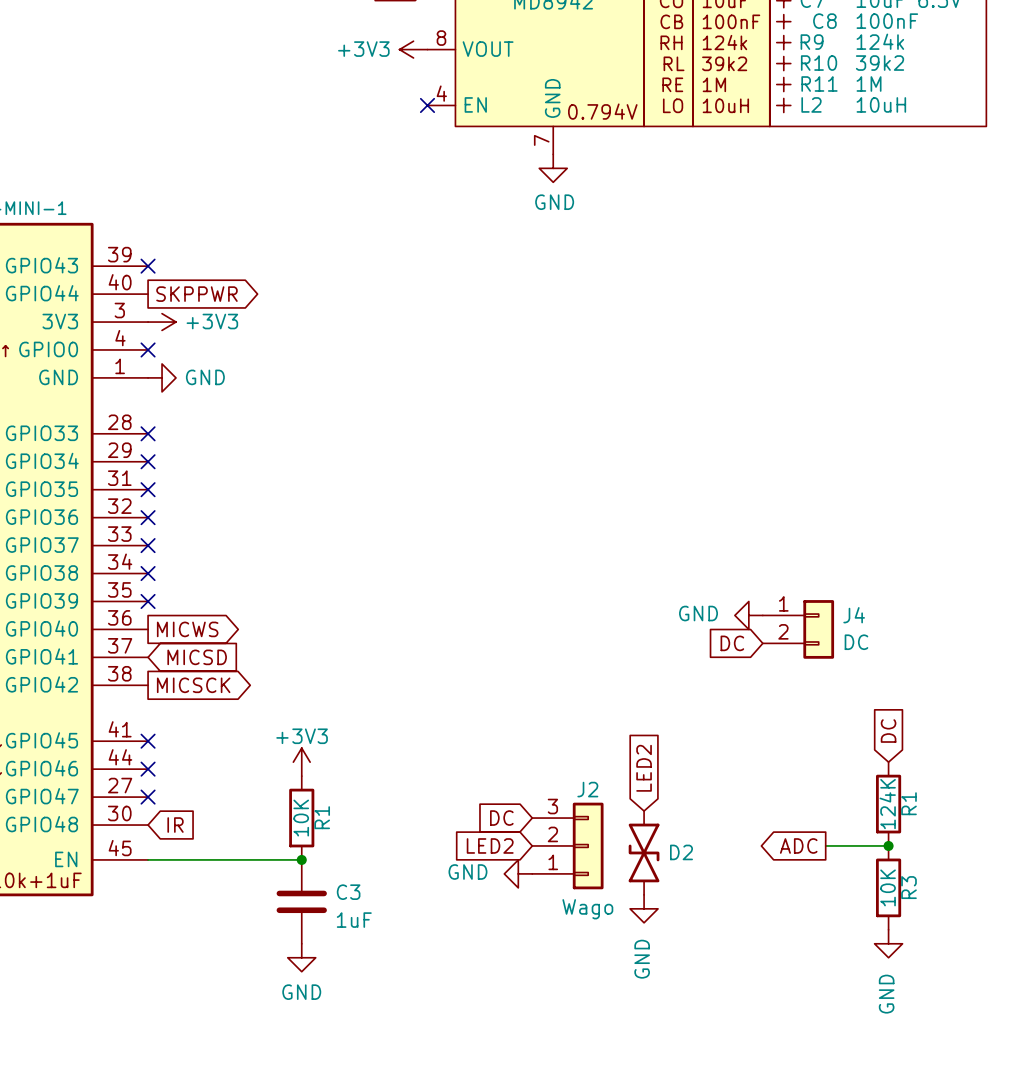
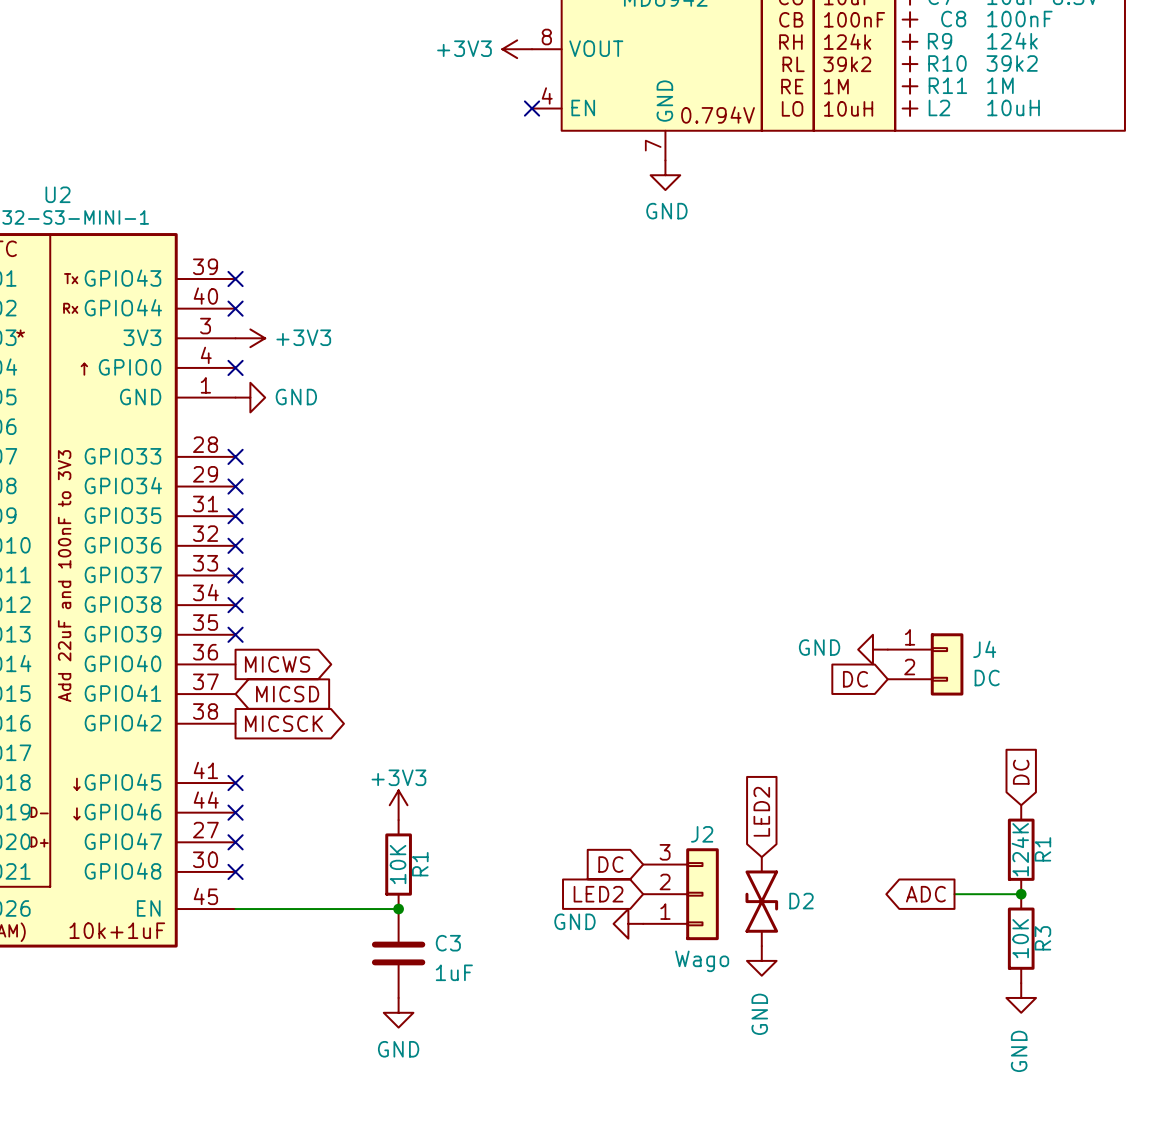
no-connect mark: none -> (235, 308)
global label: SKPPWR (196, 294) -> none
no-connect mark: none -> (235, 871)
global label: IR (175, 825) -> none

